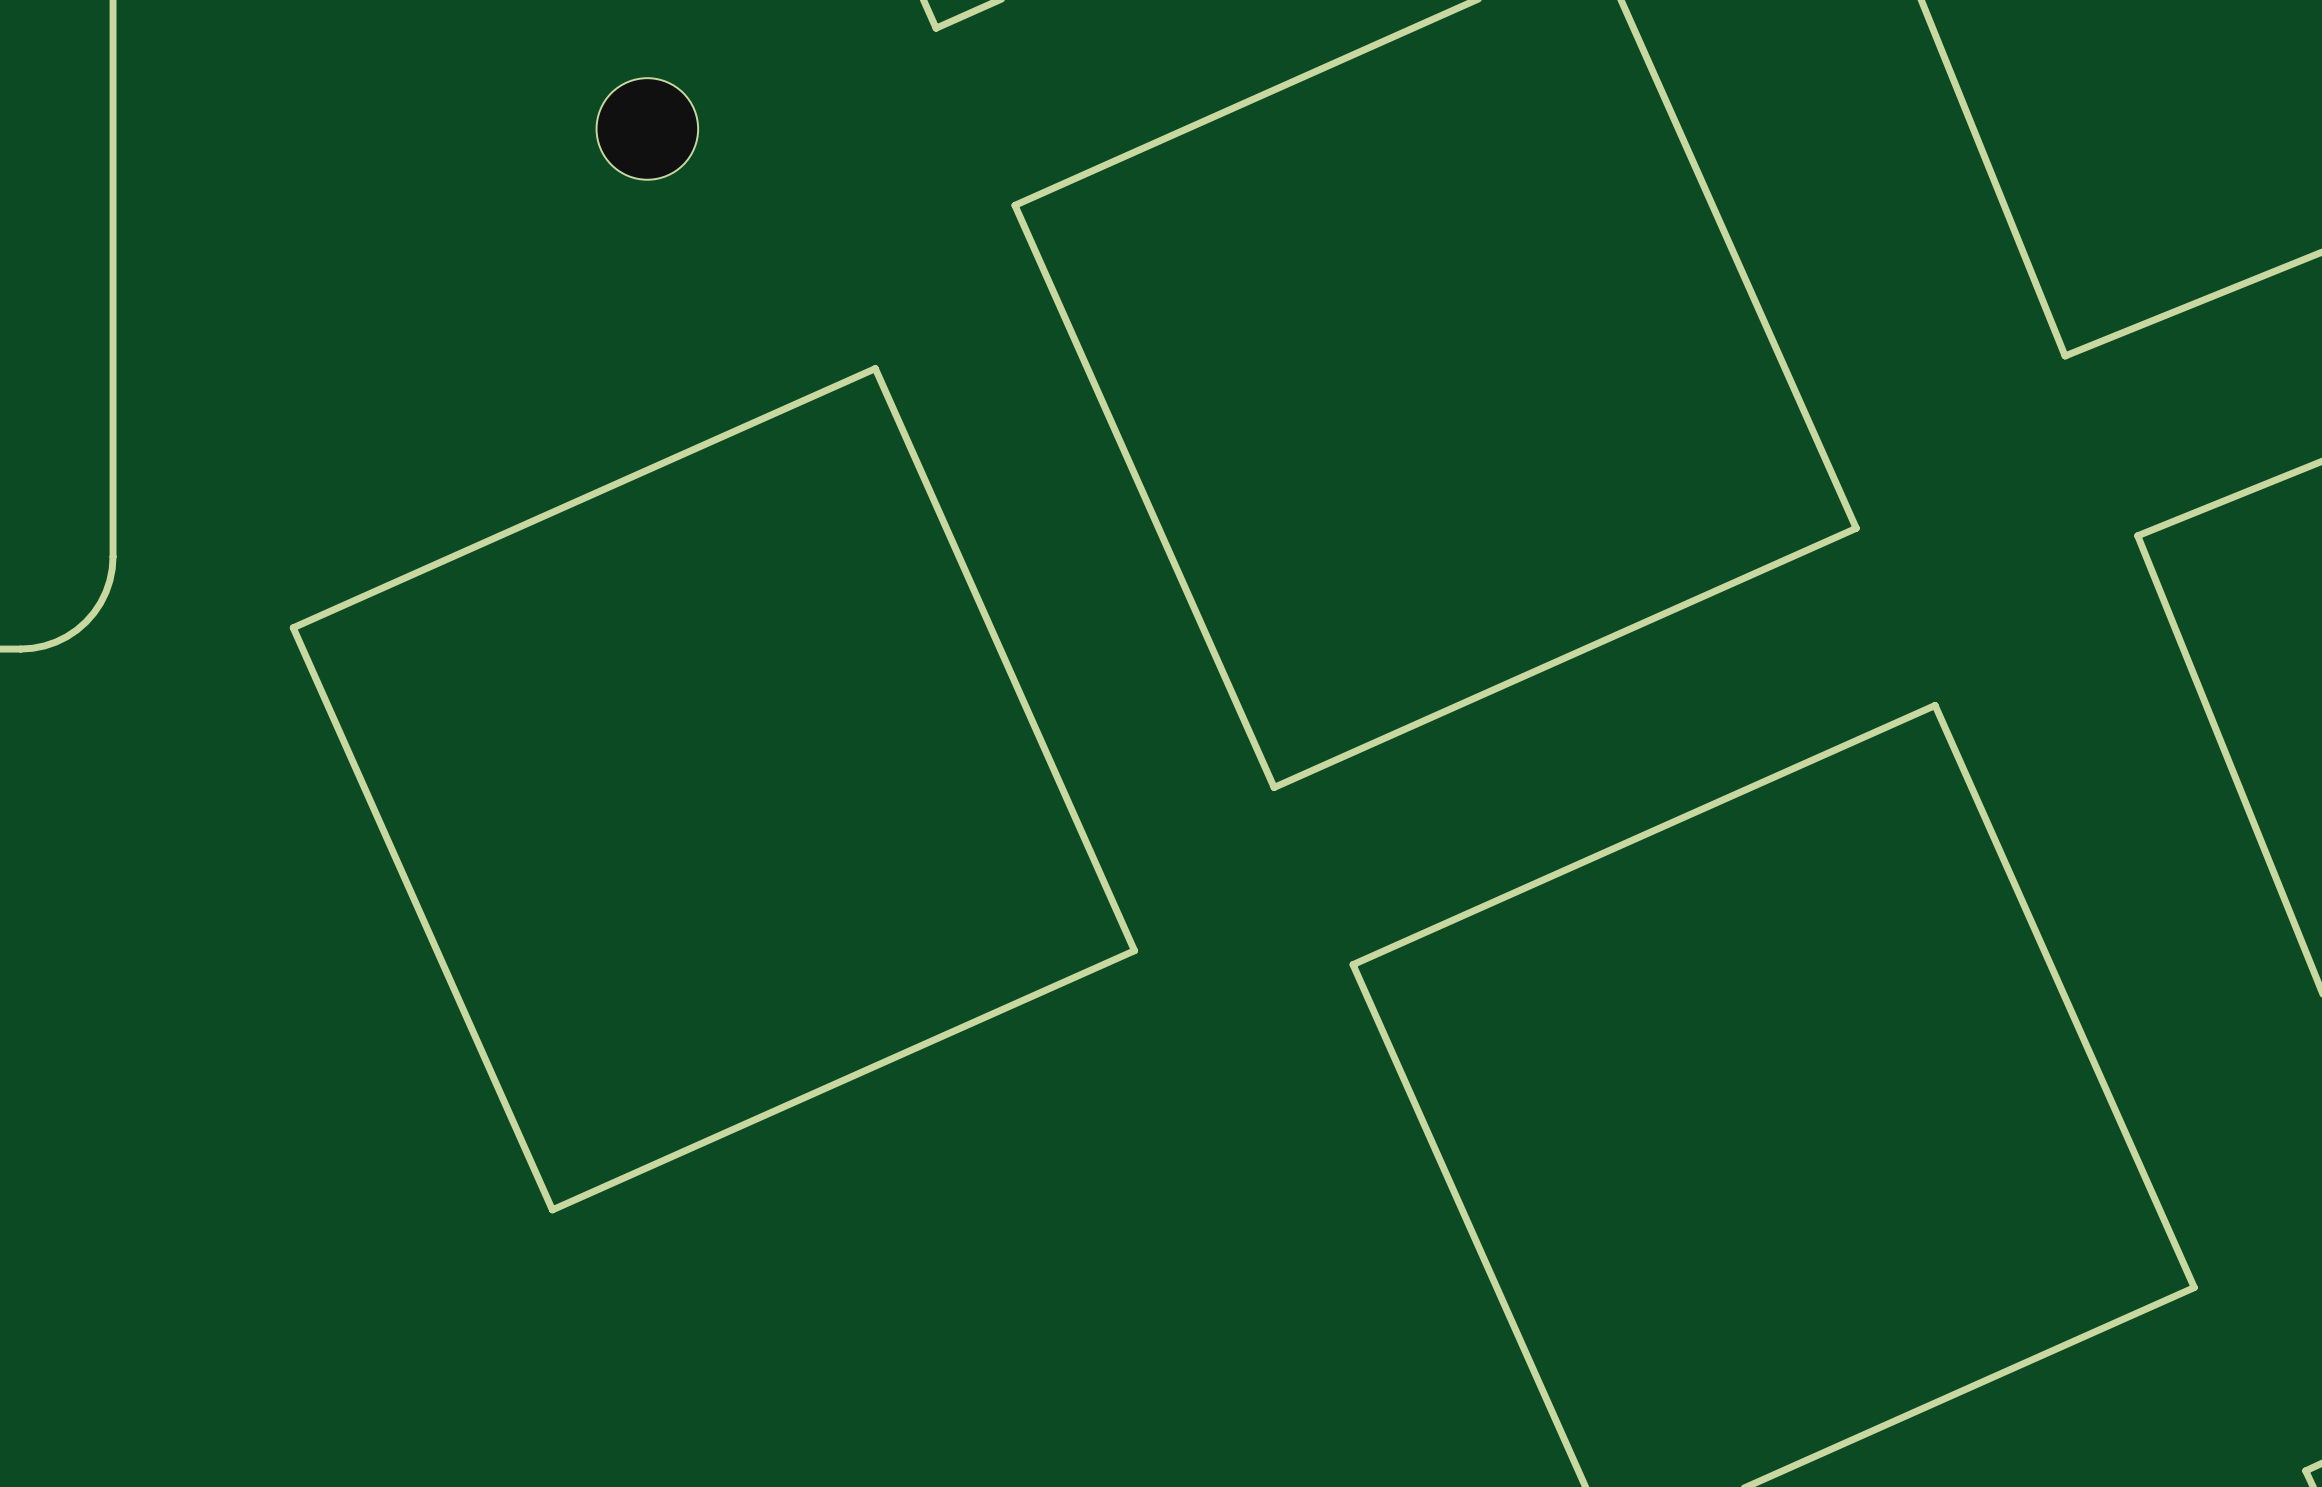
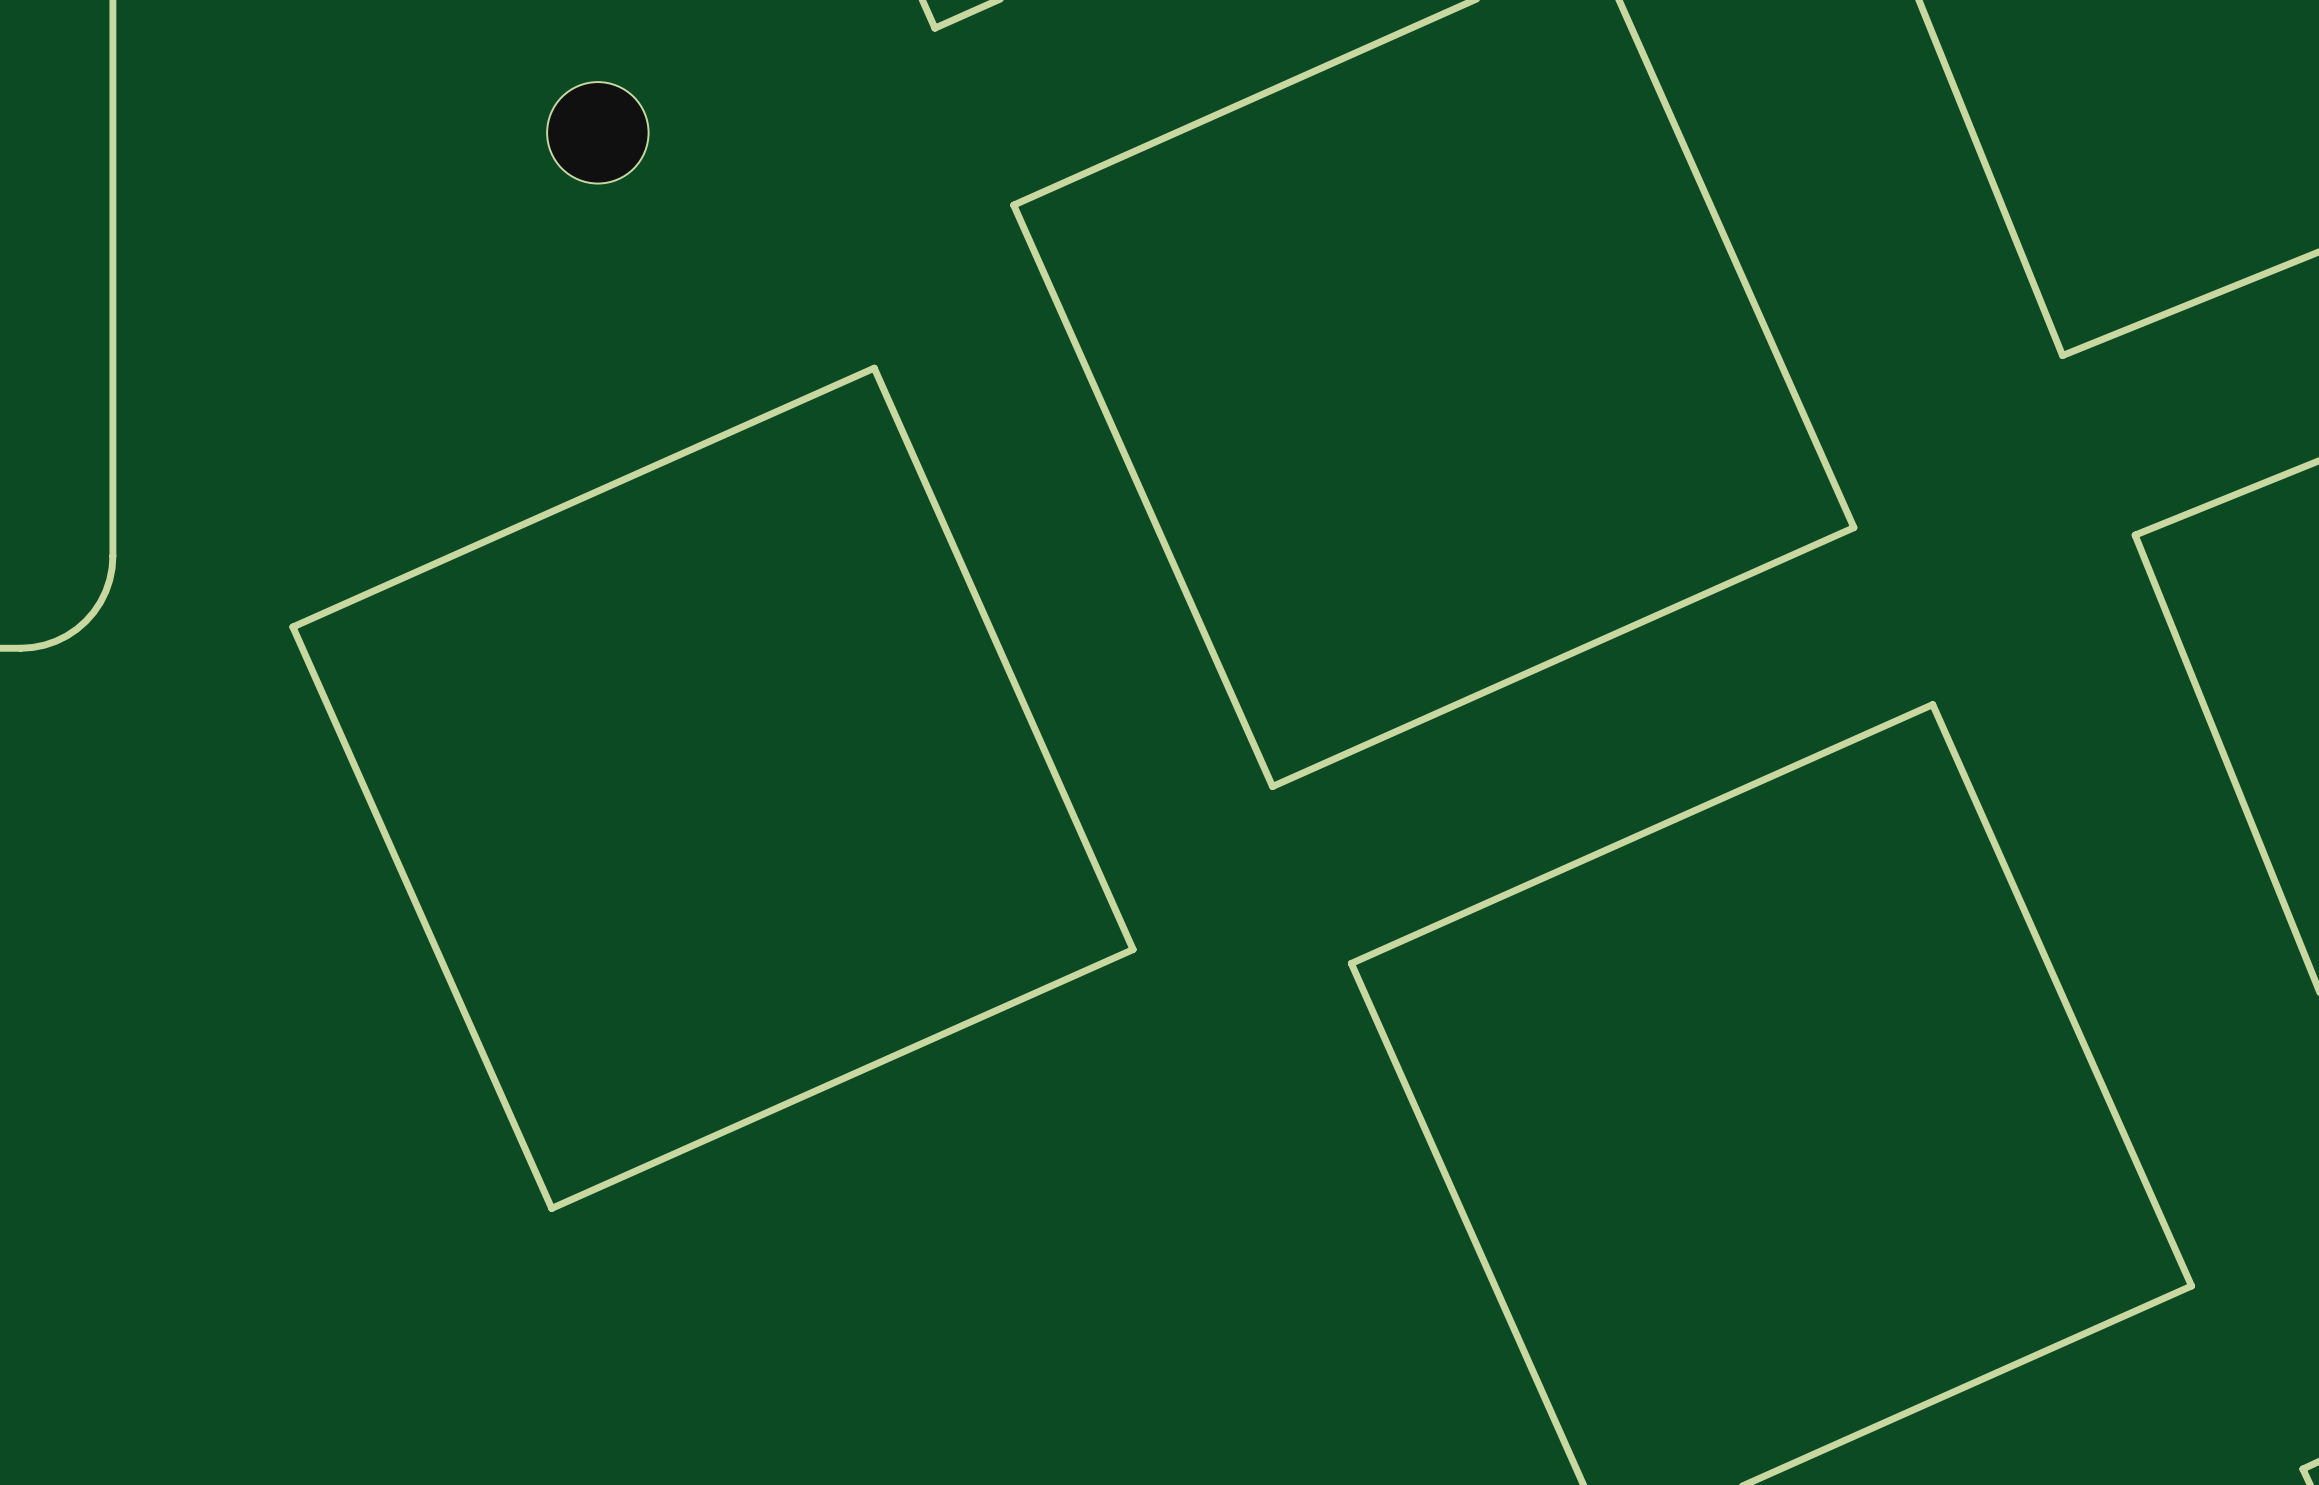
part position: (647, 128) -> (597, 132)

